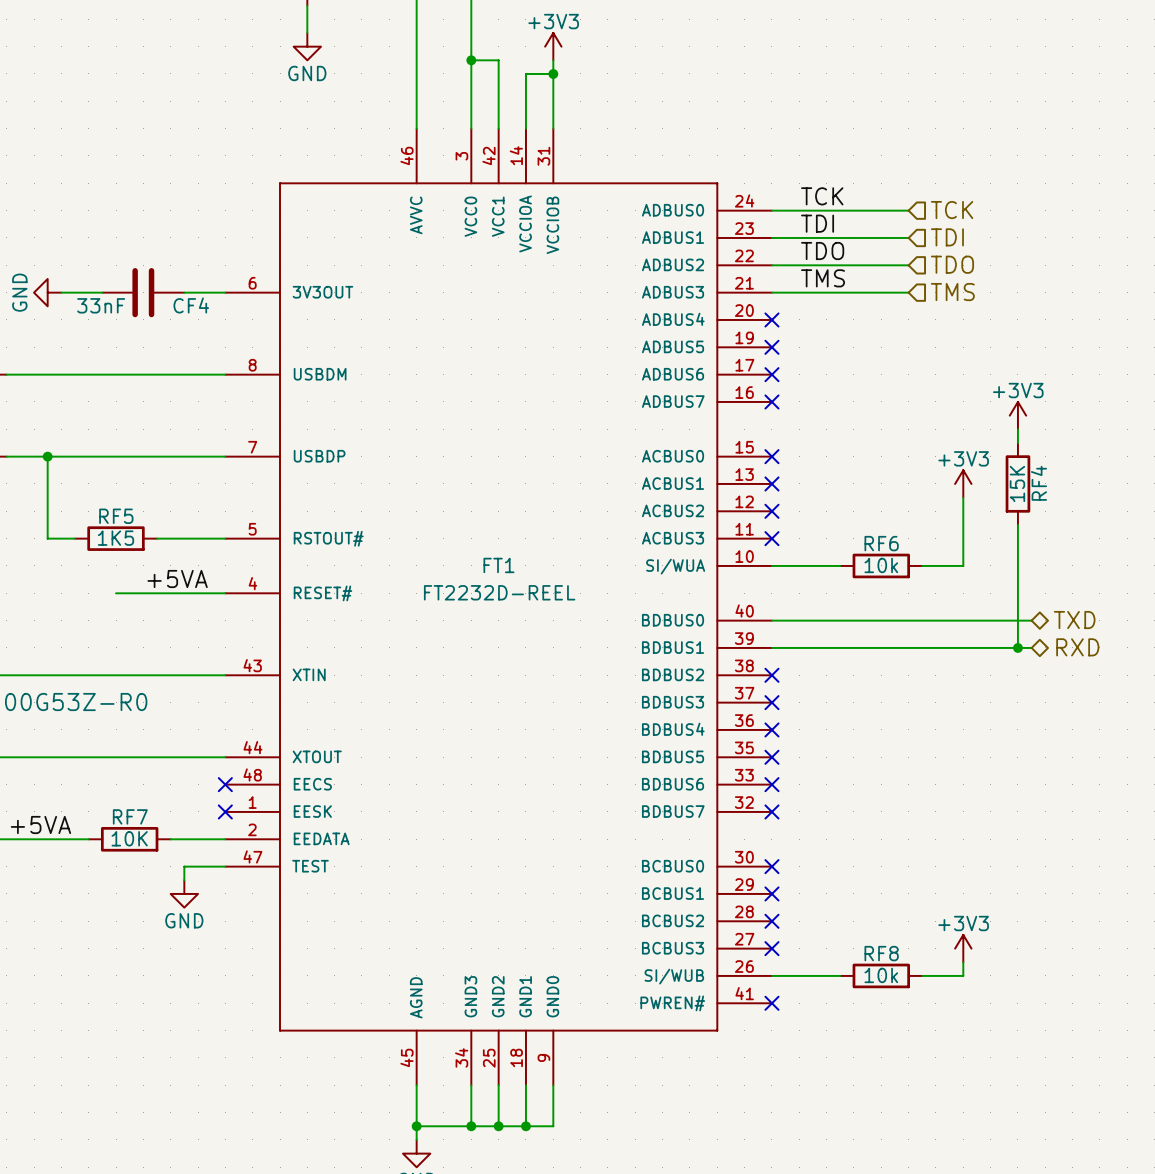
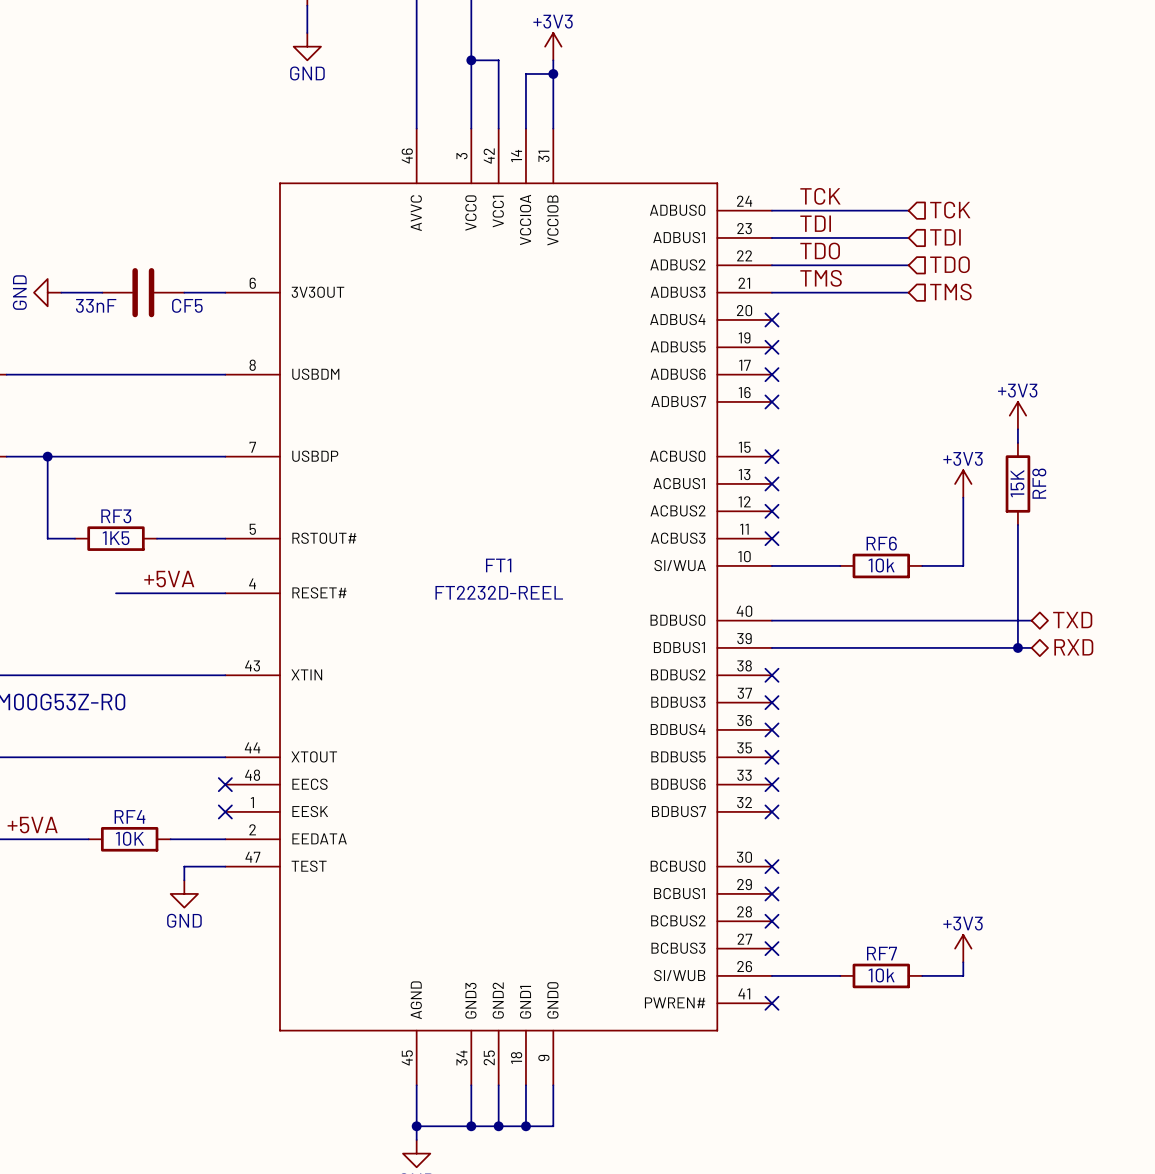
CF4 name: CF4 (191, 305) -> CF5 (187, 305)
RF4 name: RF4 (1038, 483) -> RF8 (1039, 483)
RF5 name: RF5 (116, 516) -> RF3 (116, 516)
RF7 name: RF7 (130, 816) -> RF4 (129, 816)
RF8 name: RF8 (881, 953) -> RF7 (882, 953)

